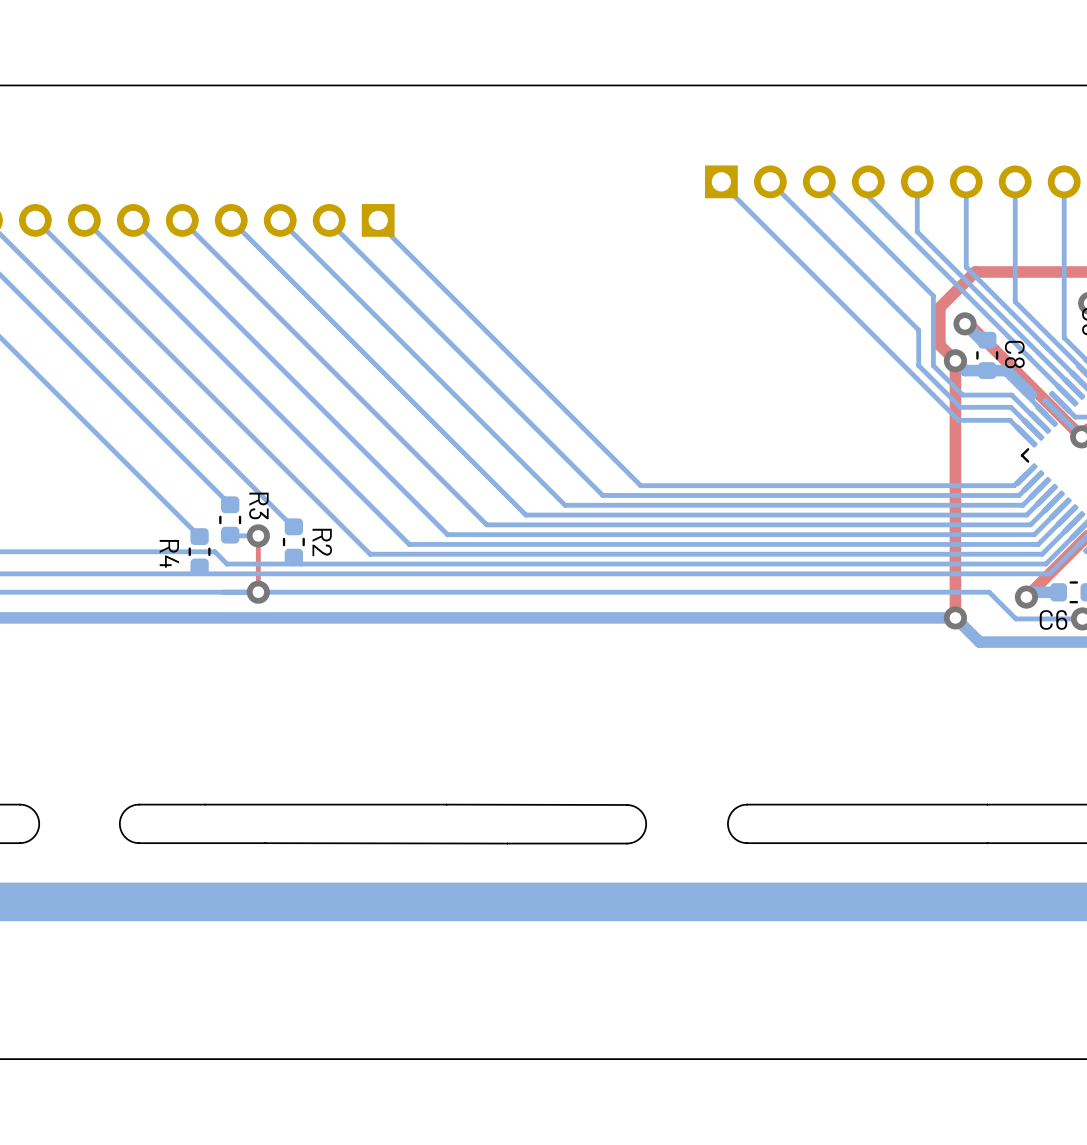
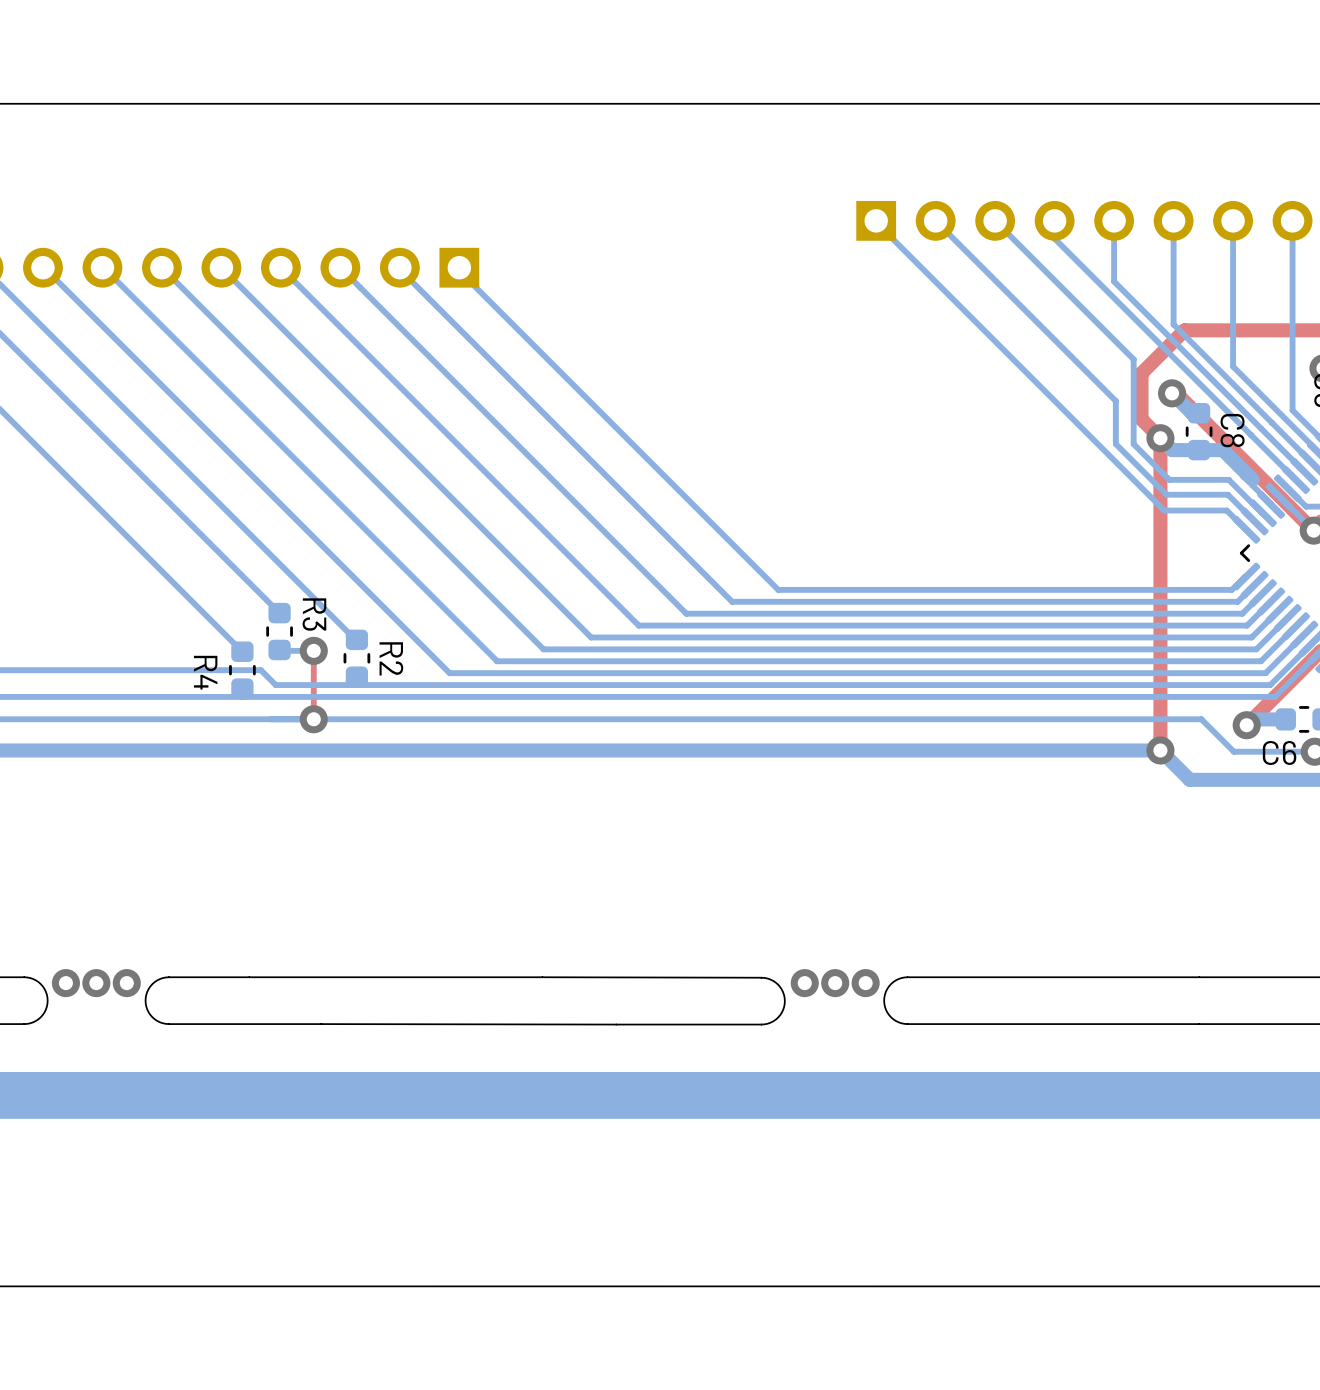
via: none -> (65, 983)
via: none -> (96, 983)
via: none -> (126, 983)
via: none -> (804, 983)
via: none -> (835, 983)
via: none -> (865, 983)

